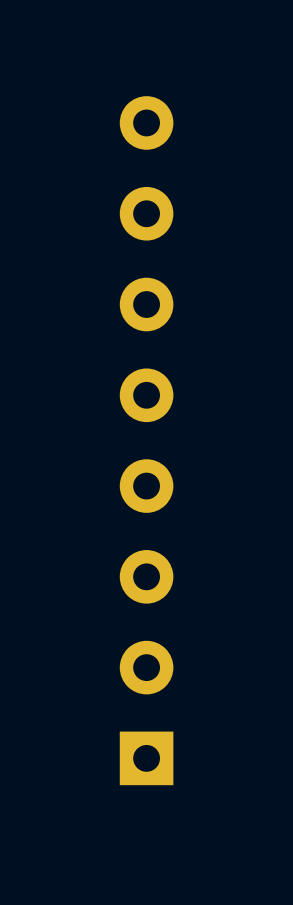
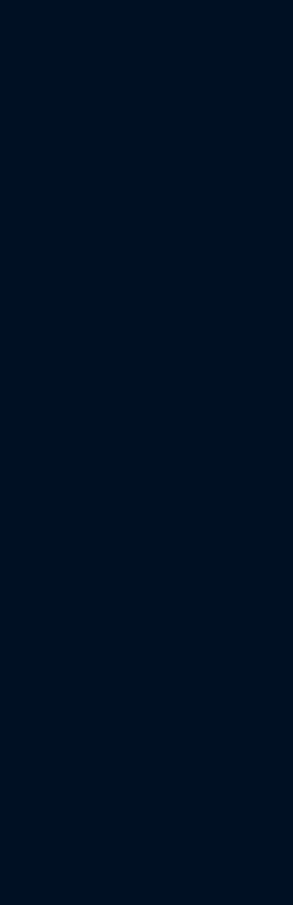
part: (146, 440) -> none

